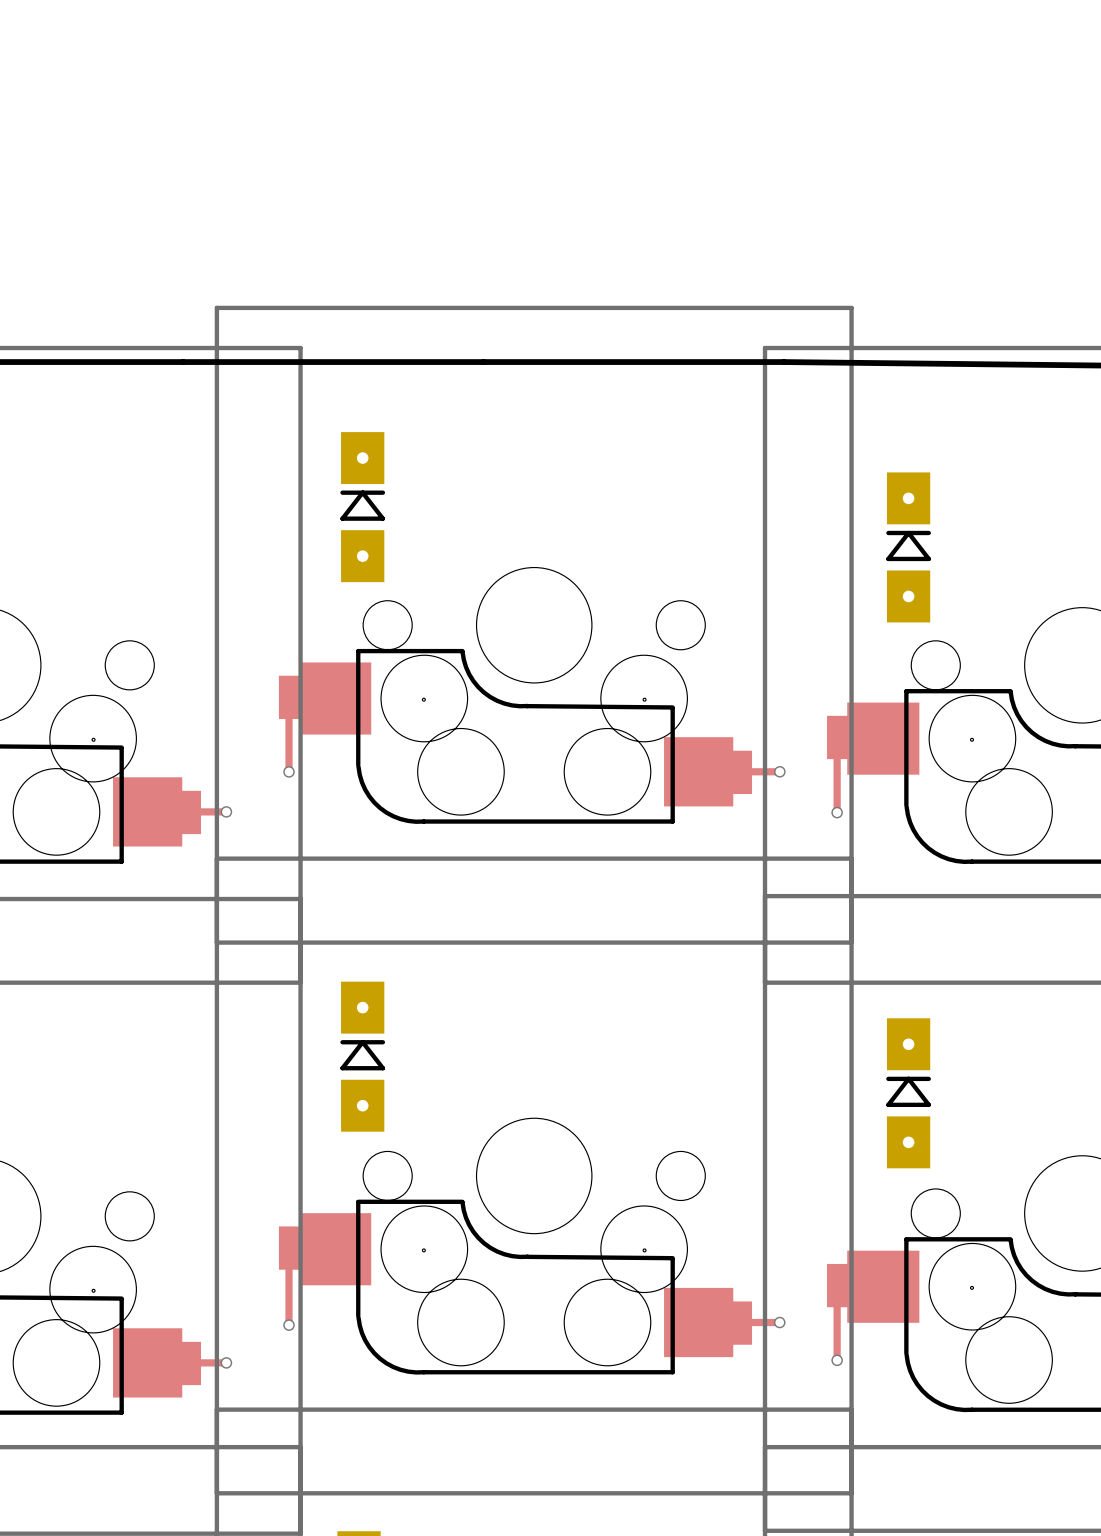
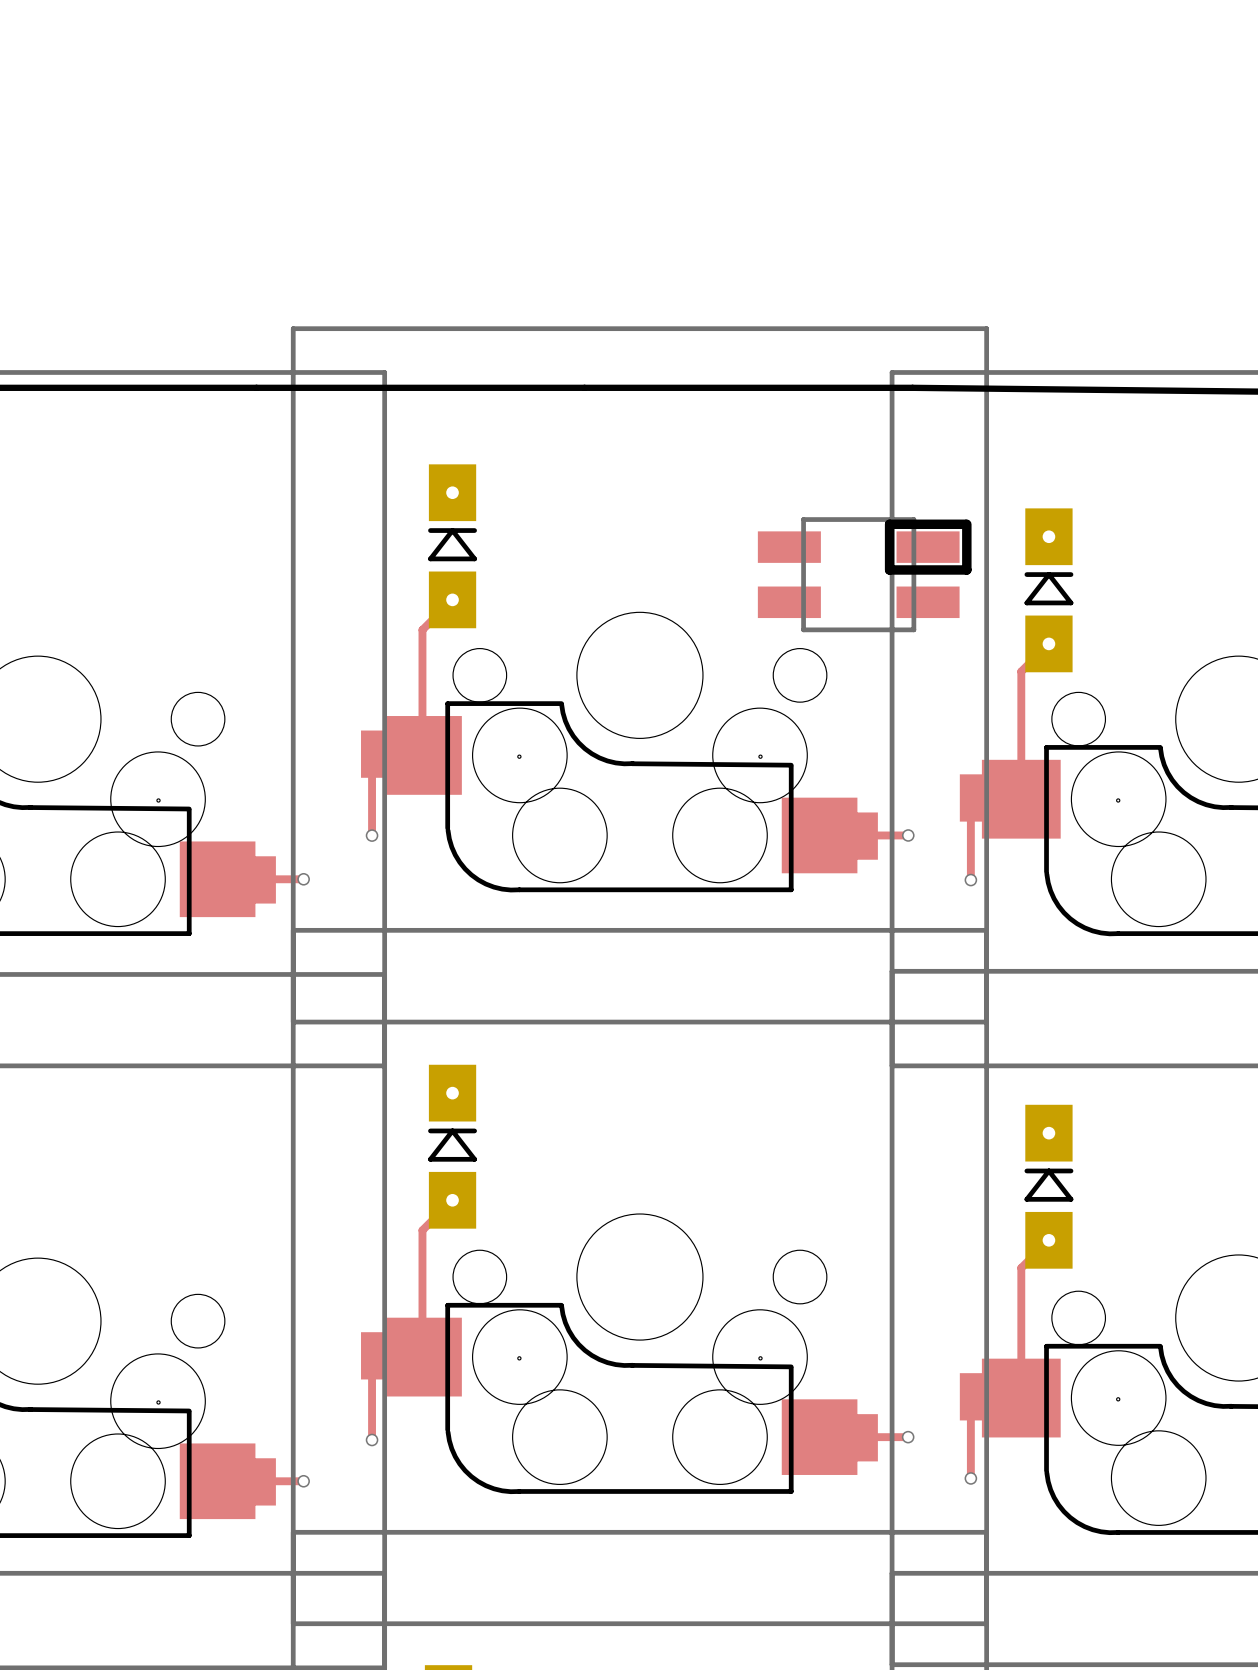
part: none -> (864, 574)
track: none -> (452, 599) (422, 629) (422, 755)
track: none -> (1048, 643) (1021, 671) (1021, 799)
track: none -> (452, 1200) (422, 1230) (422, 1357)
track: none -> (1048, 1240) (1021, 1267) (1021, 1398)

